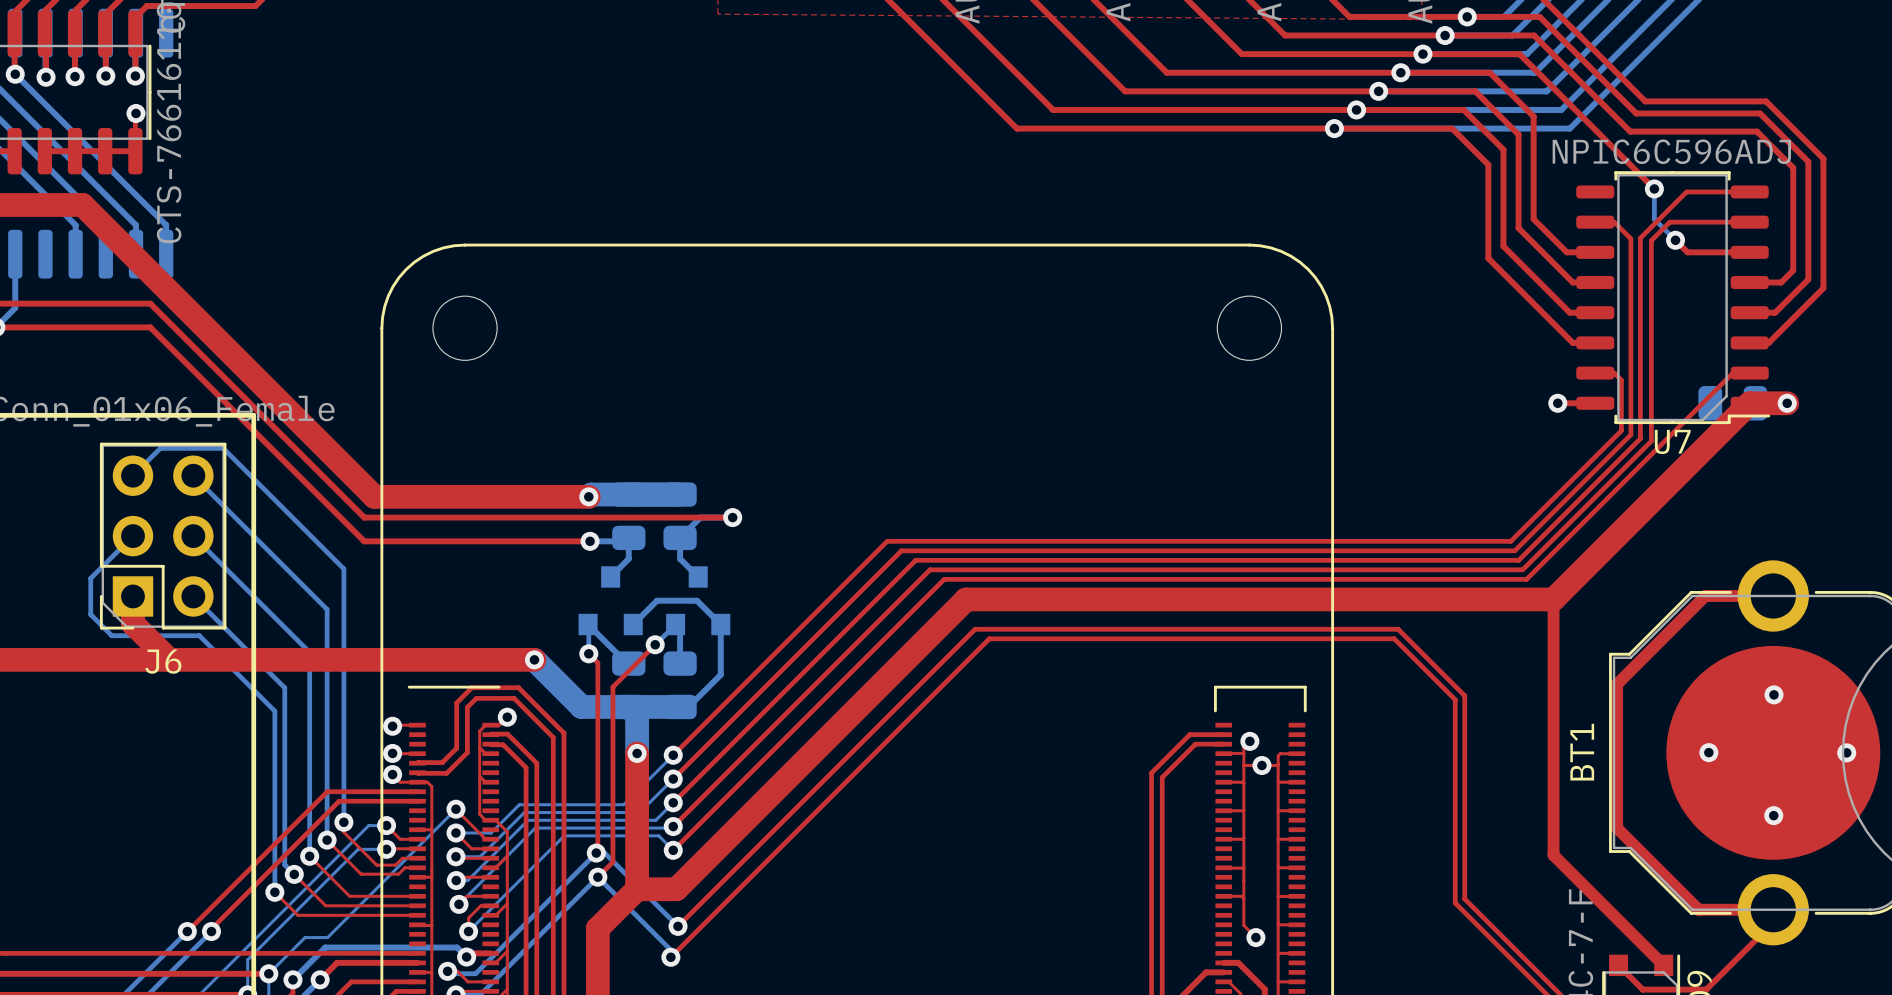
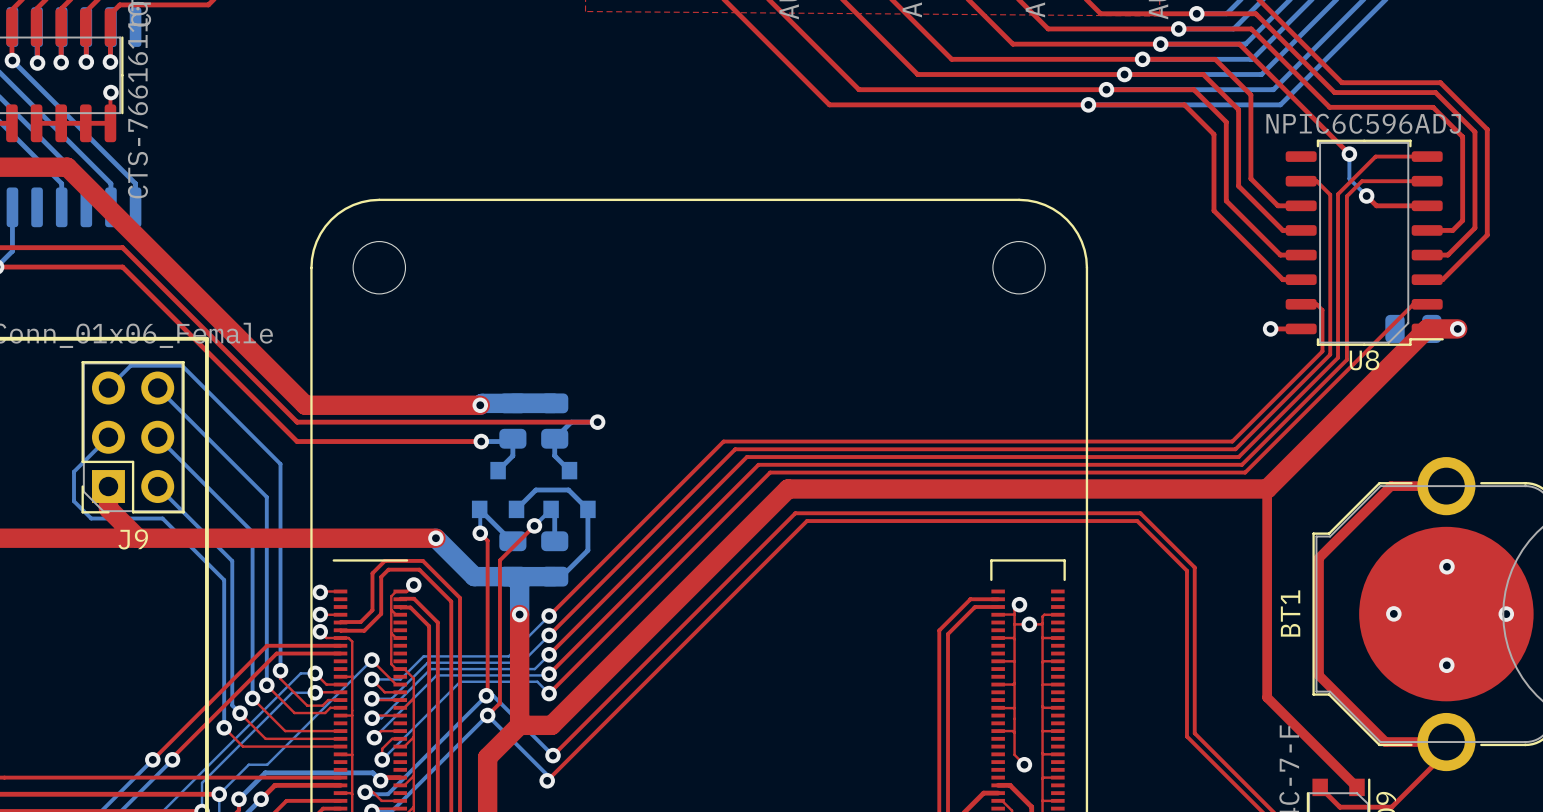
U7 name: U7 (1672, 441) -> U8 (1364, 360)
J6 name: J6 (163, 661) -> J9 (133, 539)

